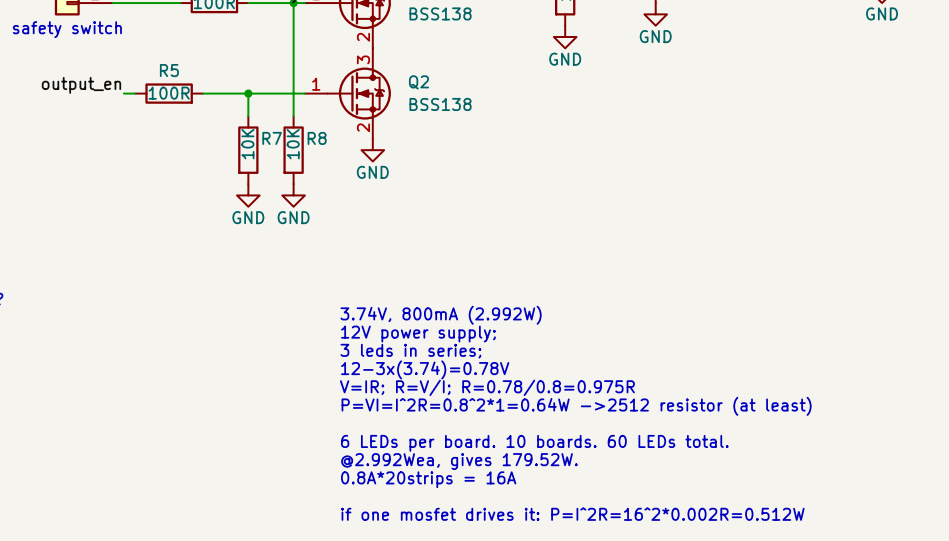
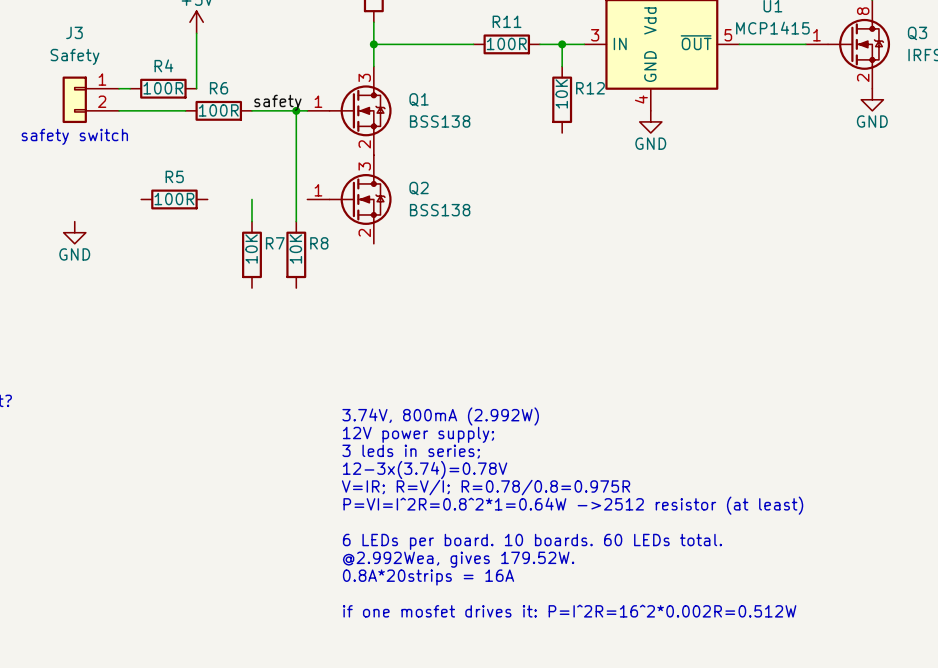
power symbol: GND (565, 37) -> none
label: output_en (81, 85) -> none
wire: (123, 93) (135, 93) -> none
wire: (203, 93) (304, 93) -> none
junction: (248, 93) -> none
power symbol: none -> GND (74, 232)
power symbol: GND (372, 150) -> none
power symbol: GND (248, 195) -> none
power symbol: GND (293, 195) -> none

